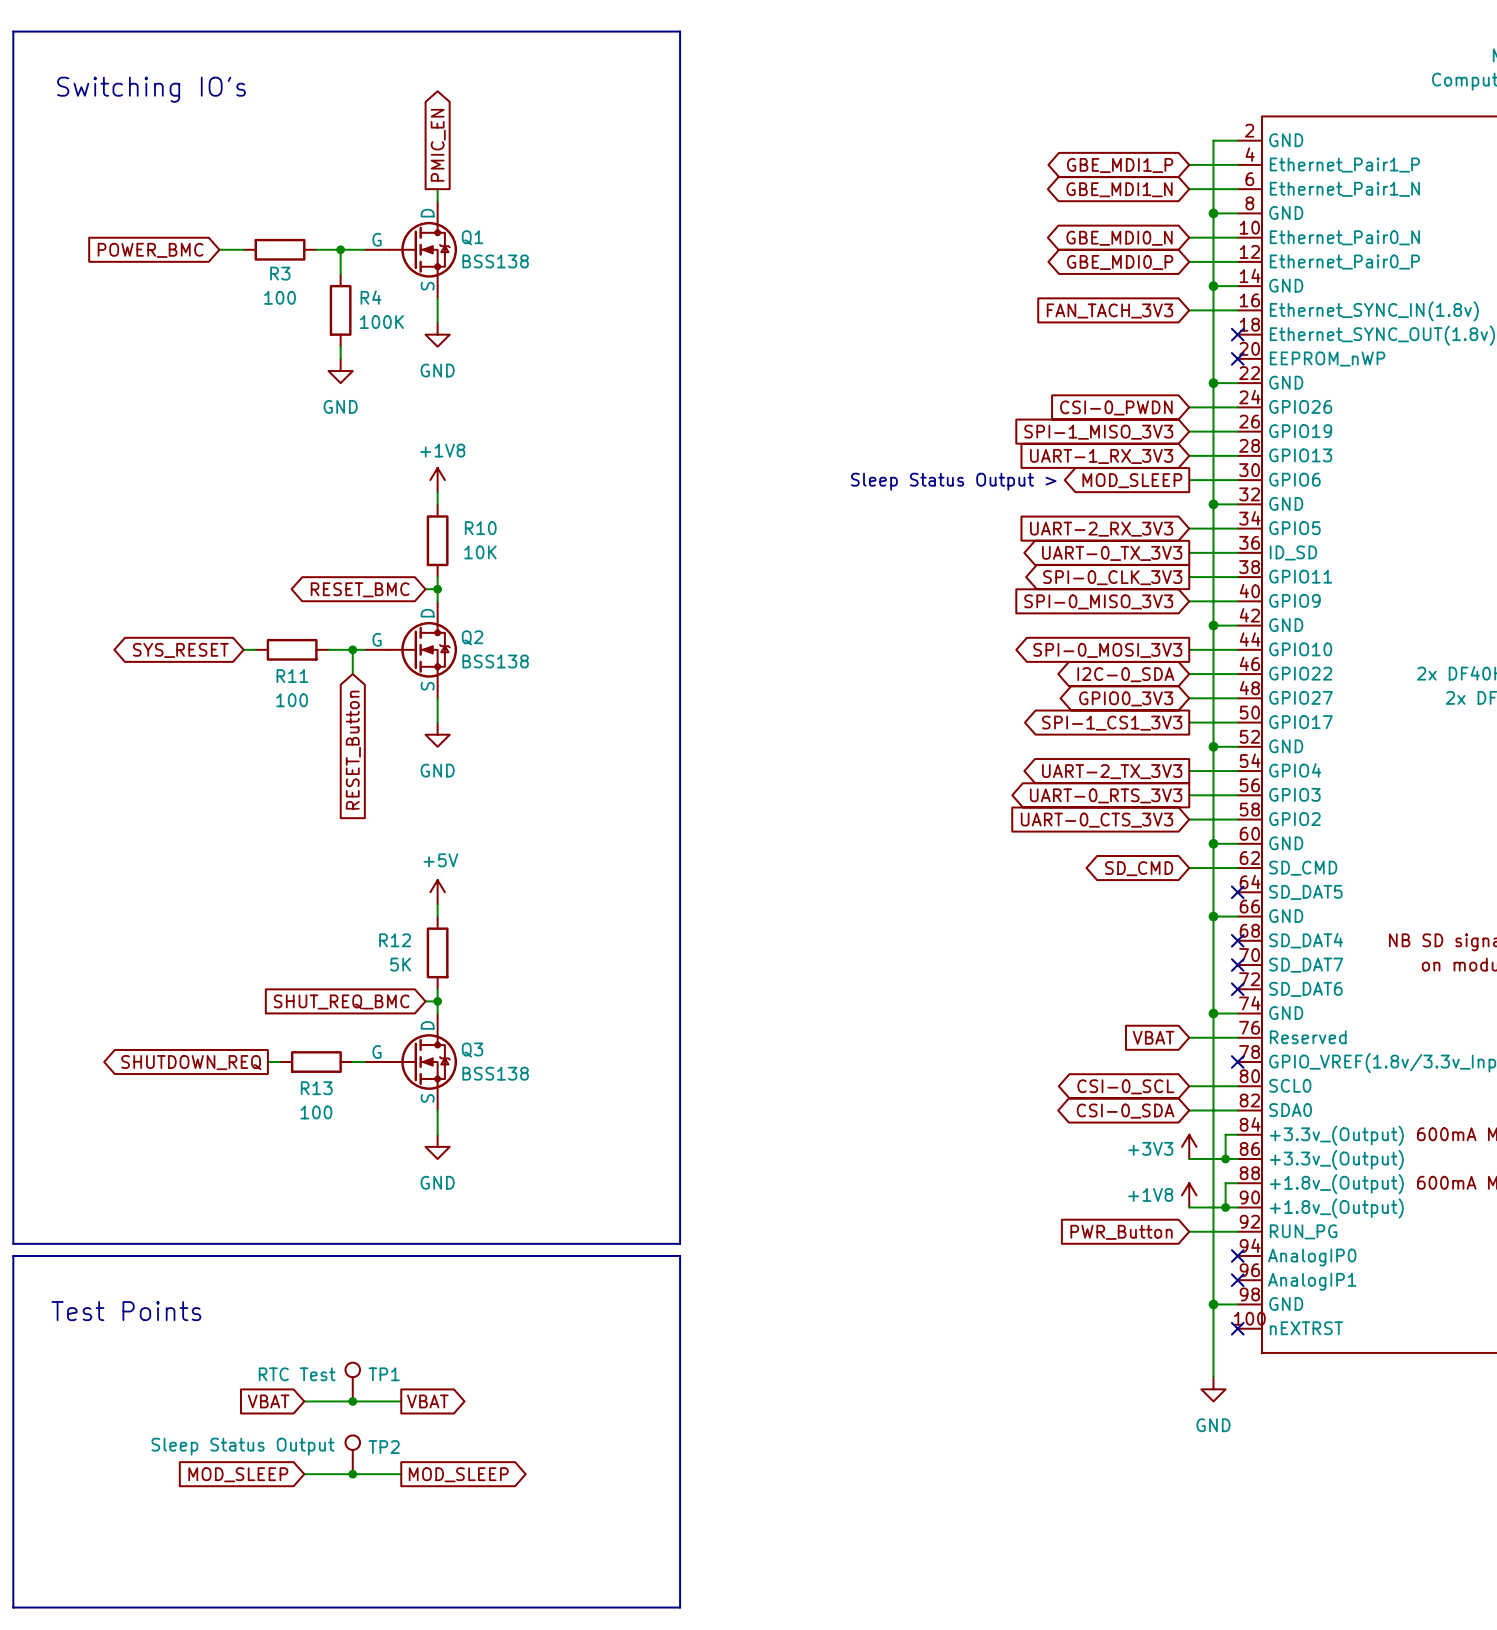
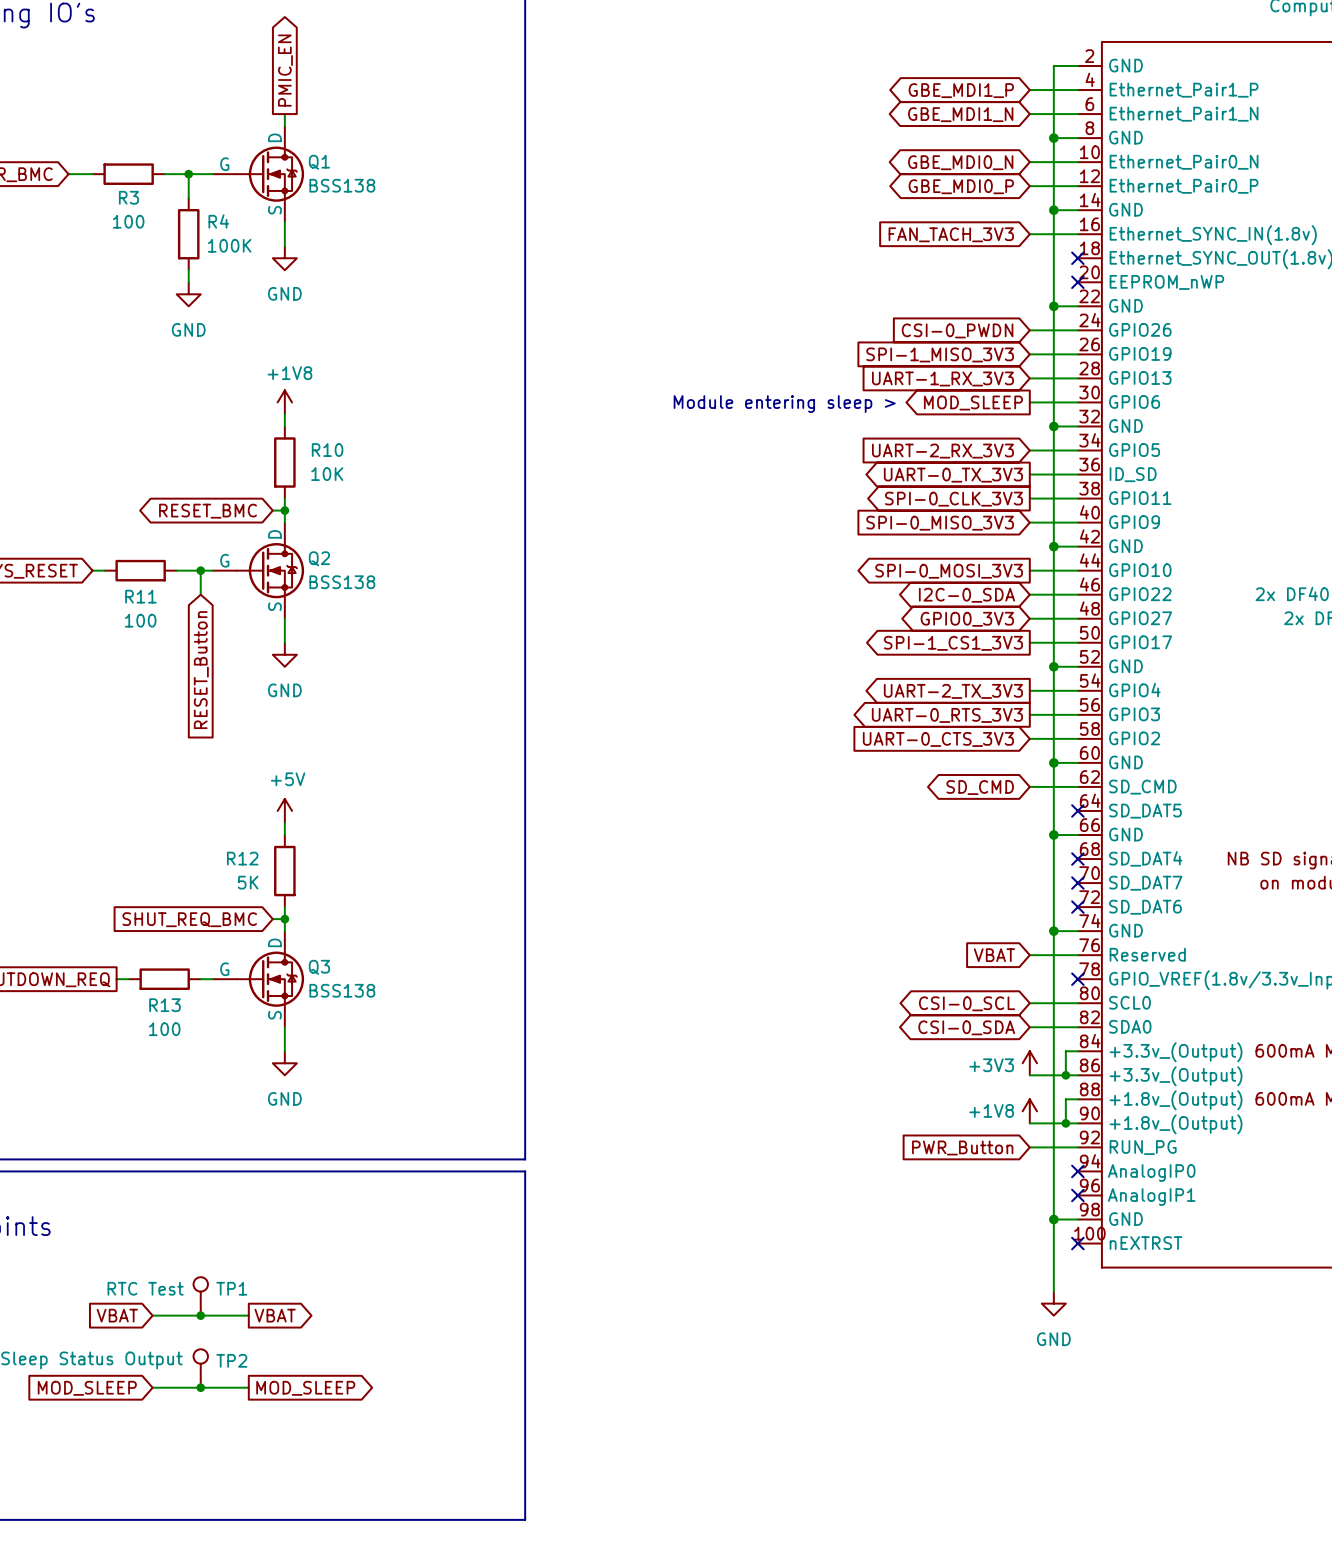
text: none -> Module entering sleep > (784, 404)
text: Sleep Status Output > (953, 481) -> none

